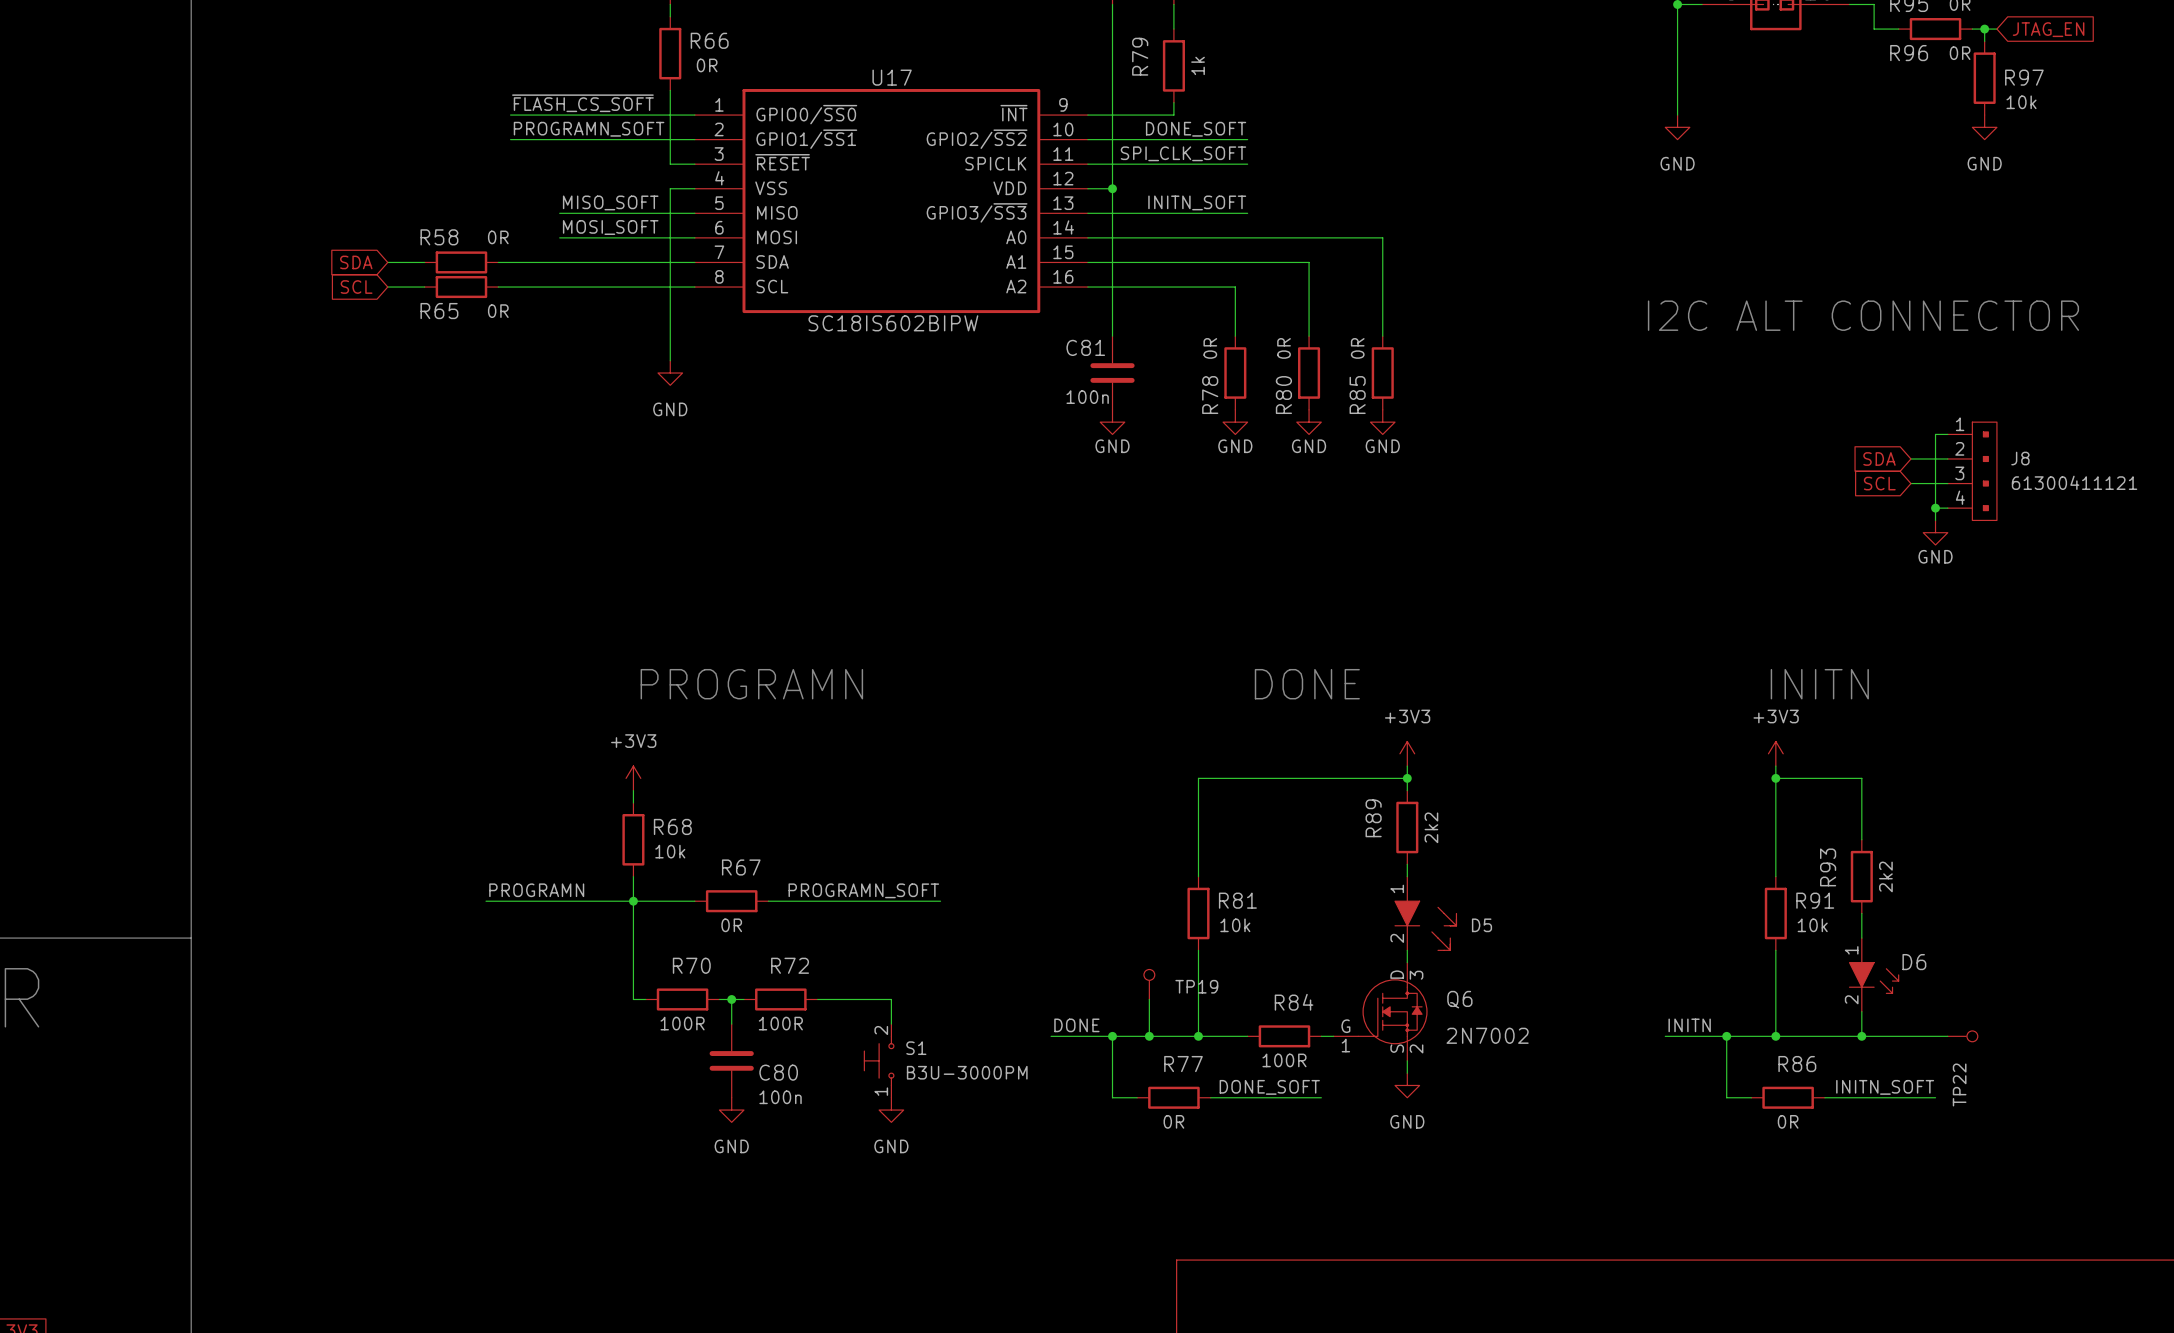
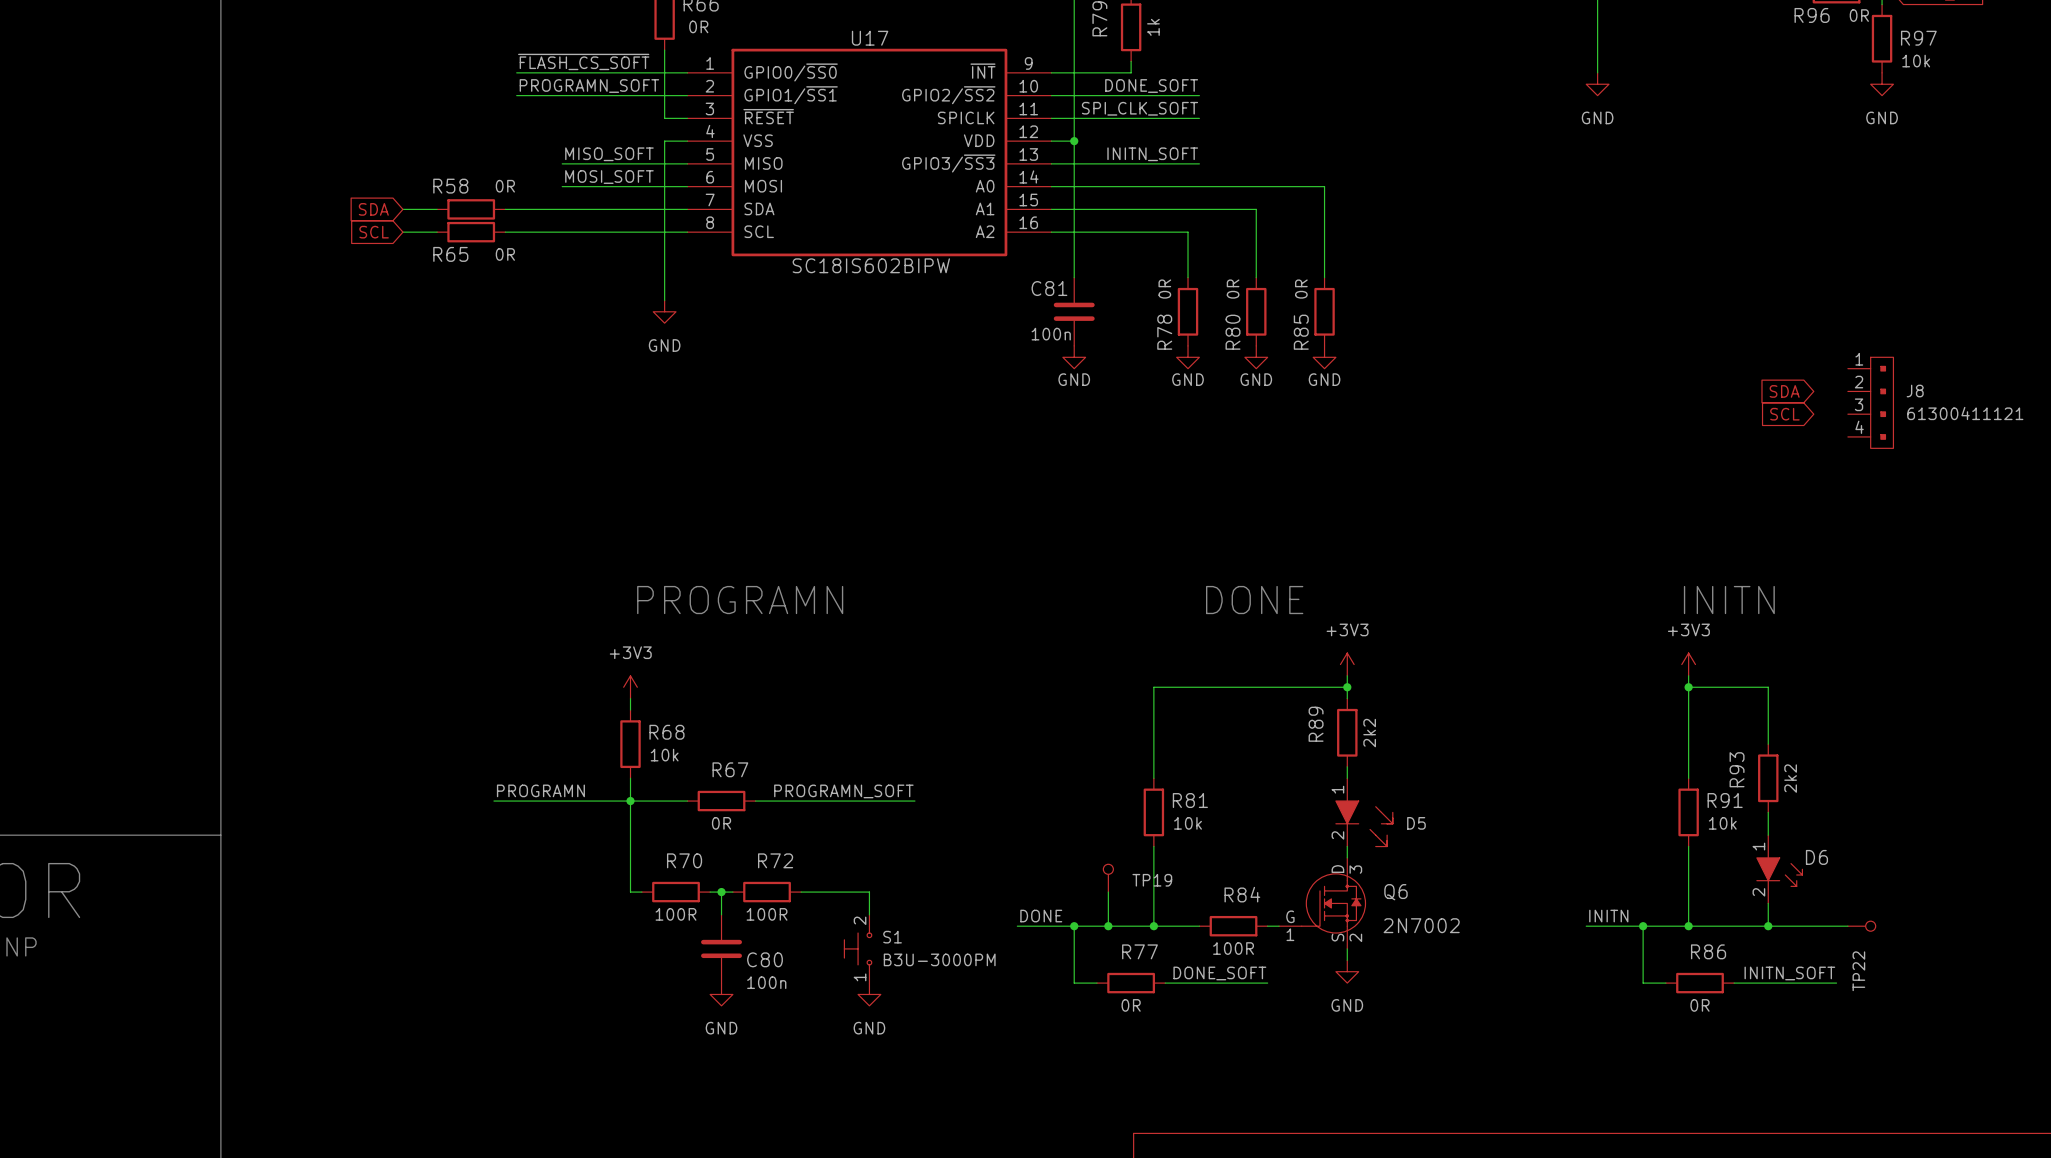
text: I2C ALT CONNECTOR (1863, 315) -> none
wire: (1947, 434) (1935, 434) (1935, 520) -> none
wire: (1910, 458) (1947, 458) -> none
wire: (1910, 483) (1947, 483) -> none
wire: (1935, 508) (1947, 508) -> none
junction: (1935, 508) -> none
power symbol: GND (1935, 532) -> none

